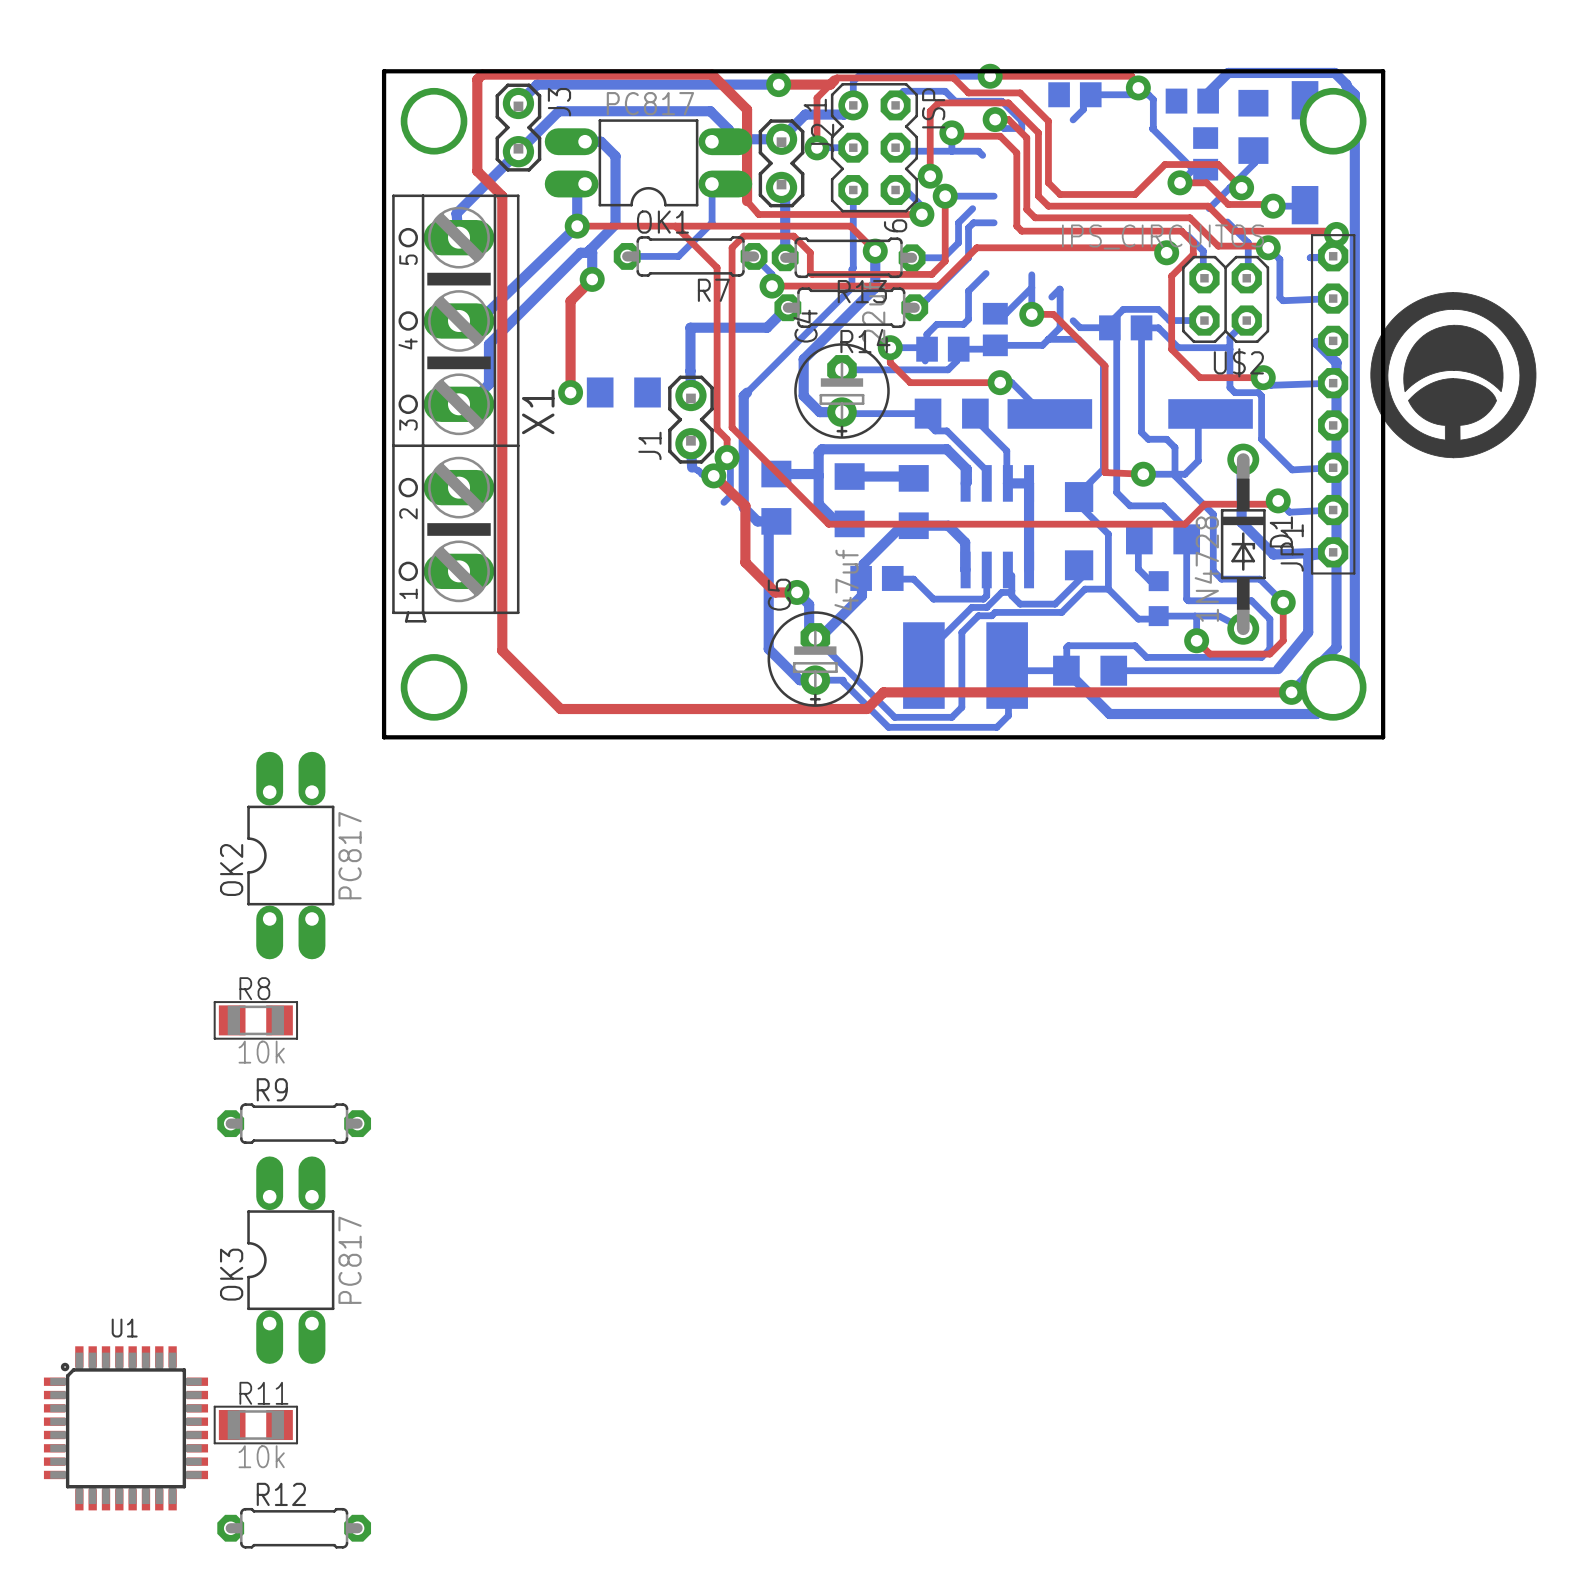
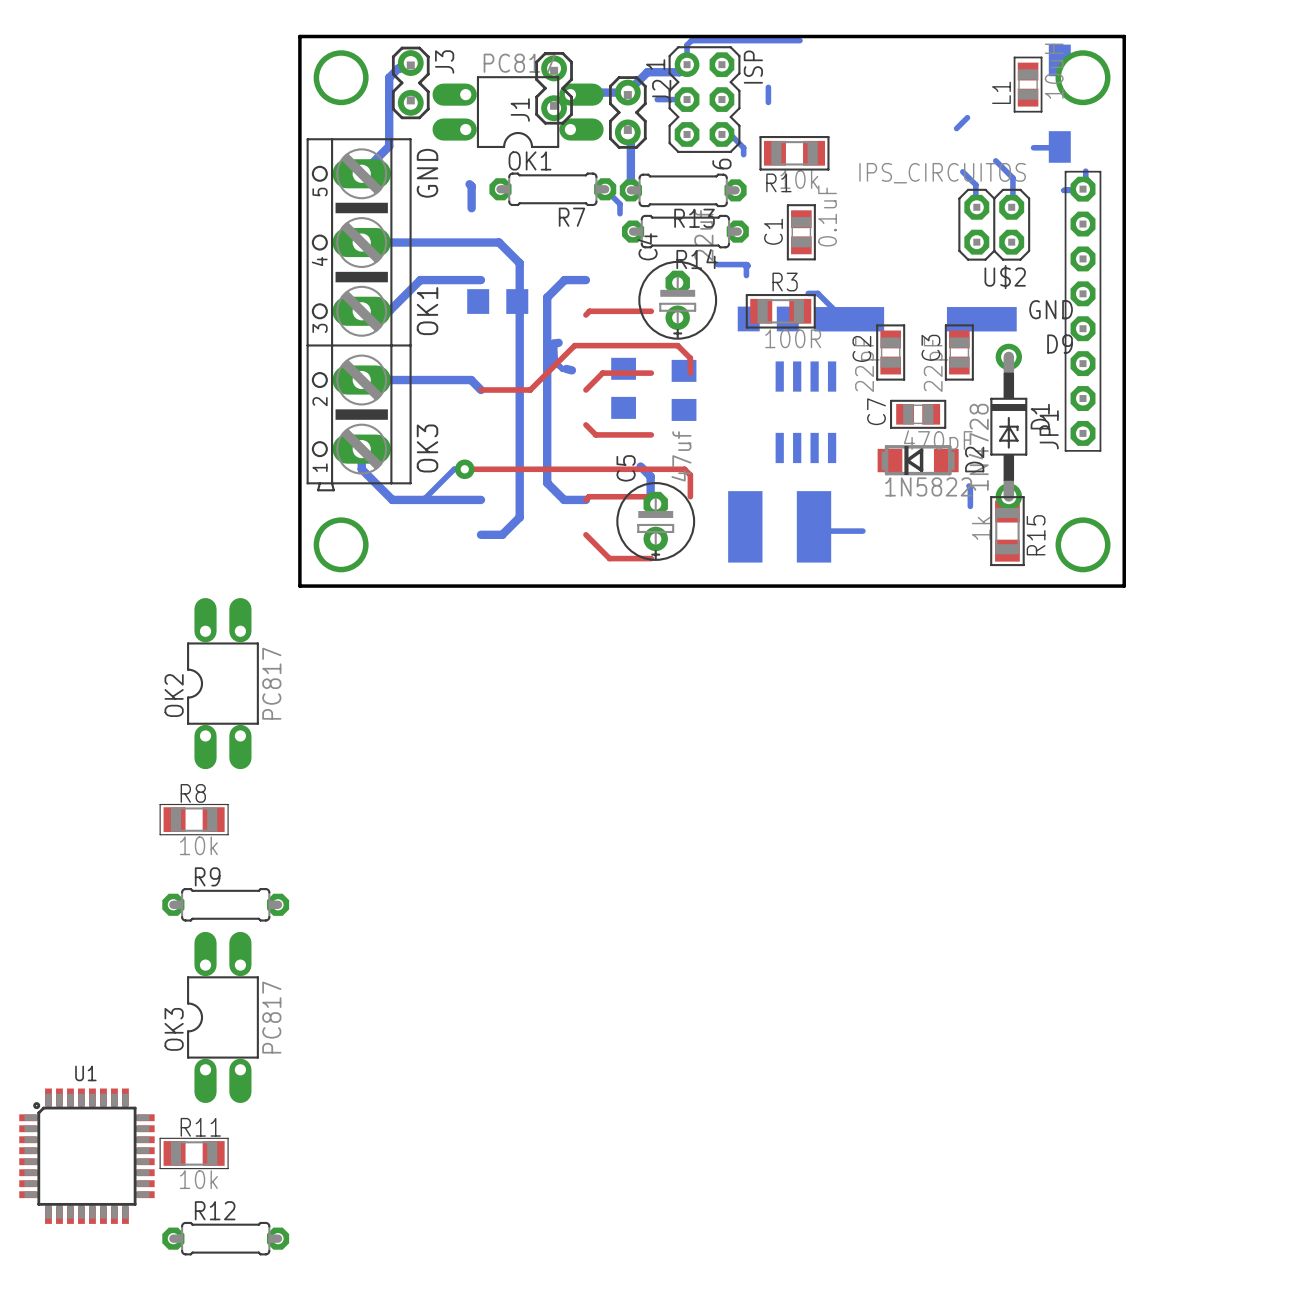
top track: (990, 76) (1131, 76) (1138, 87) -> none
via: (990, 76) -> none
top track: (834, 80) (830, 84) (778, 84) -> none
bottom track: (778, 84) (537, 84) (518, 103) -> none
via: (778, 84) -> none
via: (1138, 87) -> none
bottom track: (1208, 93) (1228, 72) (1334, 72) (1354, 94) (1354, 675) (1316, 714) (1109, 714) (1066, 670) (1066, 647) (1068, 645) (1135, 645) (1146, 657) (1261, 657) (1269, 649) (1269, 619) (1251, 600) (1188, 600) (1186, 599) (1186, 529) (1163, 505) (1130, 505) (1116, 492) (1116, 334) (1109, 327) (1080, 327) (1073, 320) -> none
C1 side: bottom (1074, 94) -> top (801, 232)
L1 side: bottom (1192, 101) -> top (1028, 84)
bottom track: (895, 105) (895, 99) (903, 91) (945, 91) (955, 101) (1001, 101) (1021, 121) (1021, 128) (1004, 128) (995, 119) -> none
top track: (995, 119) (1008, 119) (1026, 137) (1026, 209) (1035, 217) (1189, 217) (1218, 246) (1266, 246) (1268, 247) -> none
via: (995, 119) -> none
bottom track: (1073, 119) (1083, 109) (1083, 102) (1090, 94) (1148, 94) (1153, 99) (1152, 128) (1193, 169) -> none
R1 side: bottom (1253, 126) -> top (794, 153)
top track: (951, 132) (955, 136) (1000, 136) (1016, 152) (1016, 226) (1021, 231) (1181, 231) (1193, 242) (1193, 254) (1171, 276) (1171, 349) (1199, 377) (1263, 377) -> none
via: (951, 132) -> none
bottom track: (585, 141) (601, 141) (615, 156) (615, 224) (587, 252) (580, 252) (488, 344) (488, 384) (470, 402) (460, 402) (459, 404) -> (480, 280) (420, 280) (389, 311) (361, 311)
bottom track: (714, 144) (728, 144) (728, 129) (710, 111) (558, 111) (456, 213) (459, 237) -> (416, 68) (398, 68) (389, 77) (389, 146) (361, 173)
top track: (817, 147) (817, 97) (836, 77) (953, 77) (968, 92) (1020, 92) (1048, 121) (1048, 182) (1060, 194) (1135, 194) (1165, 164) (1218, 164) (1241, 187) -> none
via: (817, 147) -> none
bottom track: (895, 147) (899, 151) (978, 151) (982, 155) -> none
bottom track: (1254, 152) (1254, 162) (1209, 208) -> none
part: (1205, 153) -> none
top track: (930, 176) (930, 111) (938, 102) (1008, 102) (1038, 132) (1038, 196) (1048, 206) (1208, 206) (1233, 231) (1333, 231) (1336, 234) -> none
via: (930, 176) -> none
top track: (1179, 182) (1206, 182) (1228, 204) (1271, 204) (1273, 206) -> none
via: (1179, 182) -> none
bottom track: (585, 184) (577, 191) (577, 226) (484, 315) (459, 320) -> (480, 534) (502, 534) (519, 517) (519, 263) (499, 242) (361, 242)
bottom track: (712, 184) (712, 222) (678, 256) (627, 256) -> none
via: (1241, 187) -> none
bottom track: (853, 190) (851, 287) (743, 395) (743, 507) (757, 521) (776, 521) (768, 529) (768, 649) (799, 680) (843, 680) (888, 727) (996, 727) (1008, 715) (1007, 662) -> none
bottom track: (945, 196) (994, 196) -> none
top track: (945, 196) (945, 261) (931, 274) (812, 274) (810, 272) (810, 252) (793, 236) (743, 236) (732, 247) (732, 427) (828, 524) (1184, 524) (1204, 504) (1268, 504) (1271, 500) (1278, 500) -> none
via: (945, 196) -> none
via: (1273, 206) -> none
bottom track: (972, 208) (958, 222) (958, 242) (943, 257) (912, 257) -> none
top track: (921, 214) (758, 214) (747, 201) (747, 109) (712, 74) (482, 74) (477, 79) (477, 171) (502, 196) (502, 650) (560, 709) (866, 709) (883, 692) (1291, 692) -> none
via: (921, 214) -> none
bottom track: (994, 222) (973, 222) (968, 227) (968, 257) (926, 299) (914, 307) -> none
top track: (577, 226) (850, 226) (875, 251) -> none
via: (577, 226) -> none
top track: (675, 226) (717, 267) (717, 429) (727, 439) (727, 457) -> none
via: (1336, 234) -> none
text: none -> GND (427, 173)
bottom track: (1268, 247) (1279, 259) (1279, 297) (1282, 300) (1333, 298) -> none
via: (1268, 247) -> none
bottom track: (875, 251) (875, 287) (803, 359) (803, 395) (819, 412) (928, 413) (925, 416) (925, 420) (935, 430) (946, 430) (986, 470) (986, 483) -> none
via: (875, 251) -> none
top track: (1166, 252) (1161, 247) (976, 247) (938, 286) (772, 286) -> none
via: (1166, 252) -> none
bottom track: (986, 273) (968, 291) (968, 319) (963, 324) (936, 324) (926, 334) (926, 349) -> none
bottom track: (1031, 274) (1031, 314) -> none
top track: (592, 279) (570, 301) (570, 392) -> none
via: (592, 279) -> none
via: (772, 286) -> none
bottom track: (1031, 287) (1005, 313) (995, 313) -> none
drawing: [1370, 292, 1537, 459] -> none
bottom track: (1051, 297) (1060, 289) (1060, 327) (1042, 345) (995, 345) (991, 349) (958, 349) (956, 351) (956, 361) (948, 369) (841, 369) -> none
bottom track: (787, 307) (767, 327) (690, 327) (690, 395) -> none
top track: (1031, 314) (1053, 314) (1105, 366) (1105, 472) (1143, 474) -> none
via: (1031, 314) -> none
bottom track: (1204, 320) (1169, 320) (1158, 309) (1123, 309) (1109, 322) (1109, 327) -> none
bottom track: (1248, 322) (1246, 320) (1229, 337) (1229, 387) (1234, 392) (1258, 392) (1261, 395) (1261, 439) (1292, 469) (1333, 467) -> none
C3 side: bottom (1125, 327) -> top (959, 352)
C2 side: bottom (995, 329) -> top (890, 352)
bottom track: (1048, 339) (1078, 339) (1103, 364) (1103, 469) (1079, 493) (1079, 504) (1108, 534) (1108, 589) -> none
bottom track: (1333, 340) (1316, 343) (1336, 362) (1336, 647) (1291, 692) -> none
top track: (890, 347) (890, 362) (910, 382) (1000, 382) -> none
via: (890, 347) -> none
part: (942, 349) -> none
bottom track: (1229, 349) (1228, 347) (1178, 347) (1158, 327) (1141, 327) (1141, 432) (1148, 439) (1166, 439) (1174, 447) (1174, 475) (1213, 514) (1213, 570) (1221, 579) (1259, 579) (1283, 602) -> none
bottom track: none -> (585, 280) (564, 280) (547, 297) (547, 483) (564, 499) (585, 499)
bottom track: (1263, 377) (1270, 385) (1333, 383) -> none
via: (1263, 377) -> none
via: (1000, 382) -> none
via: (570, 392) -> none
text: none -> GND (1051, 309)
text: none -> OK1 (427, 311)
top track: none -> (651, 311) (589, 311) (585, 314)
X1 name: X1 (538, 411) -> none
bottom track: (975, 413) (975, 419) (1006, 450) (1006, 482) (1029, 483) (1029, 569) -> none
bottom track: (1210, 413) (1198, 426) (1198, 460) (1184, 474) (1143, 474) -> none
J1 position: (690, 419) -> (554, 88)
text: none -> D9 (1060, 344)
bottom track: (727, 457) (730, 460) (730, 495) (723, 502) -> none
via: (727, 457) -> none
bottom track: (1243, 459) (1241, 461) (1241, 522) (1273, 554) (1333, 552) (1308, 555) (1308, 632) (1276, 670) (1113, 670) -> none
bottom track: (776, 474) (816, 474) (818, 475) -> none
via: (1143, 474) -> none
top track: (713, 475) (745, 505) (745, 562) (775, 592) (797, 592) -> none
via: (713, 475) -> none
bottom track: (849, 476) (911, 476) (913, 478) -> none
top track: none -> (651, 373) (602, 373) (585, 390)
top track: none -> (690, 373) (690, 358) (677, 345) (574, 345) (530, 390) (480, 390)
bottom track: (965, 483) (966, 469) (946, 449) (821, 449) (818, 452) (818, 504) (838, 523) (849, 523) -> none
bottom track: none -> (361, 380) (471, 380) (480, 390)
bottom track: (1278, 500) (1289, 512) (1333, 510) -> none
via: (1278, 500) -> none
R3 side: bottom (913, 502) -> top (780, 311)
D2 side: bottom (1079, 531) -> top (918, 460)
bottom track: (1139, 539) (1138, 569) (1150, 581) (1158, 581) -> none
part: (1163, 539) -> none
top track: none -> (585, 424) (595, 434) (651, 434)
bottom track: (1079, 565) (1083, 569) (1083, 575) (1055, 604) (1020, 604) (1011, 595) (1011, 575) (1007, 569) -> none
bottom track: (965, 569) (965, 542) (948, 525) (902, 525) (863, 564) (863, 575) (861, 578) (861, 595) (819, 637) (815, 637) (894, 717) (951, 717) (961, 707) (961, 632) (978, 615) (991, 615) (995, 612) (1061, 612) (1085, 589) (1108, 589) -> none
bottom track: (986, 569) (986, 595) (983, 599) (933, 599) (913, 579) (892, 578) -> none
text: none -> OK3 (427, 448)
bottom track: none -> (361, 449) (361, 469) (392, 499) (480, 499)
C7 side: bottom (876, 578) -> top (918, 414)
bottom track: (1108, 589) (1138, 619) (1155, 619) (1158, 616) (1218, 616) (1243, 628) -> none
bottom track: (1011, 590) (1001, 592) (986, 607) (971, 607) (923, 655) (923, 665) -> none
via: (797, 592) -> none
bottom track: none -> (464, 469) (454, 469) (423, 499)
top track: none -> (464, 469) (684, 469) (690, 475) (690, 496)
via: none -> (464, 469)
part: (1158, 598) -> none
top track: (1283, 602) (1283, 640) (1269, 654) (1209, 654) (1196, 640) -> none
via: (1283, 602) -> none
top track: none -> (651, 496) (588, 496) (585, 499)
via: (1196, 640) -> none
R15 side: bottom (1090, 670) -> top (1007, 531)
top track: none -> (585, 534) (609, 558) (651, 558)
via: (1291, 692) -> none

